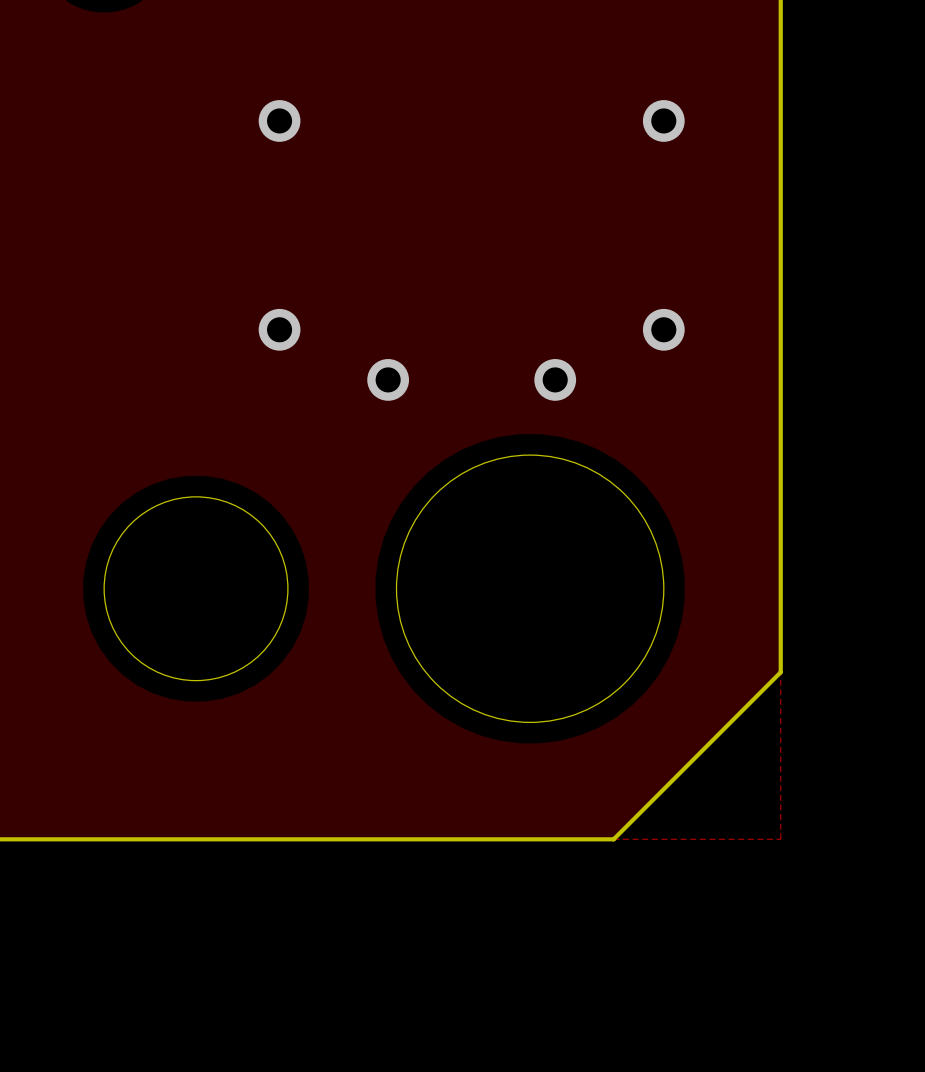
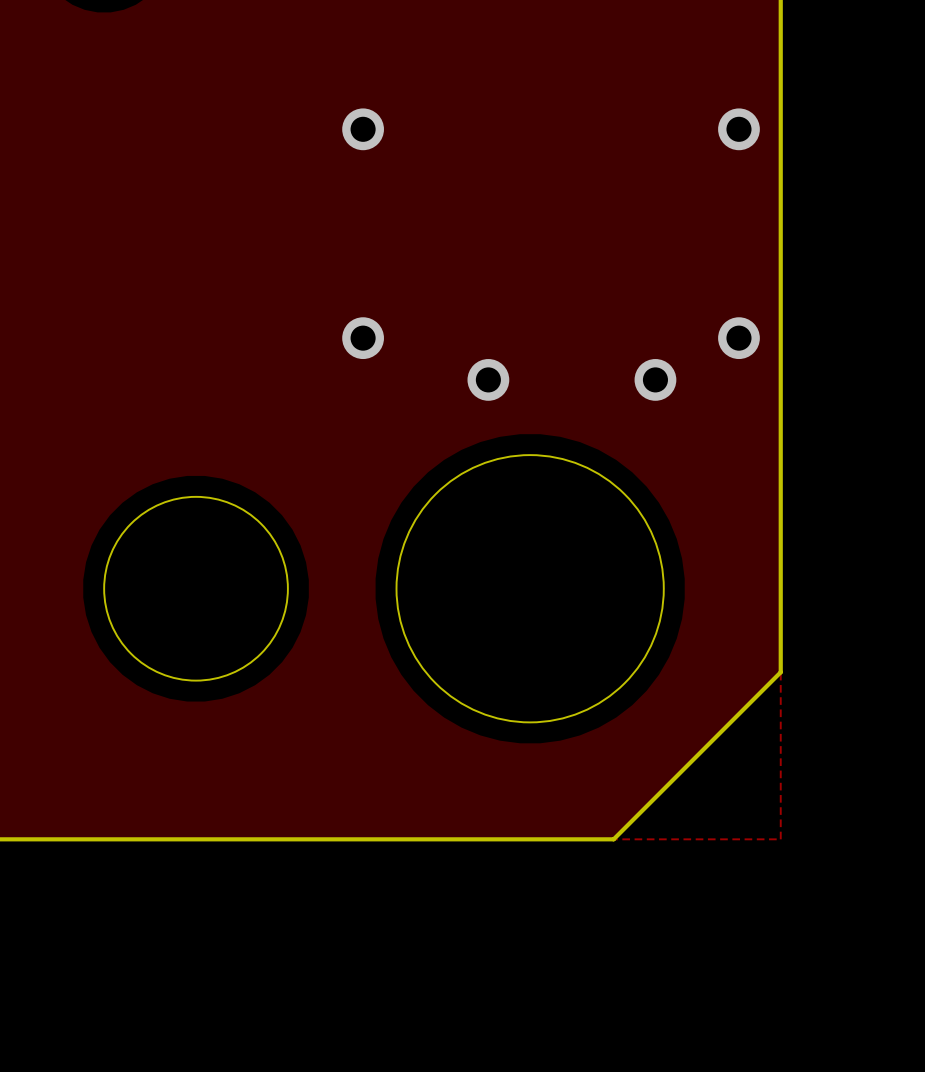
via position: (279, 120) -> (363, 129)
via position: (663, 120) -> (738, 129)
via: (279, 329) -> none
via: (663, 329) -> none
via: none -> (738, 338)
via position: (388, 379) -> (363, 338)
via: none -> (488, 379)
via: (555, 379) -> none
via: none -> (655, 379)

